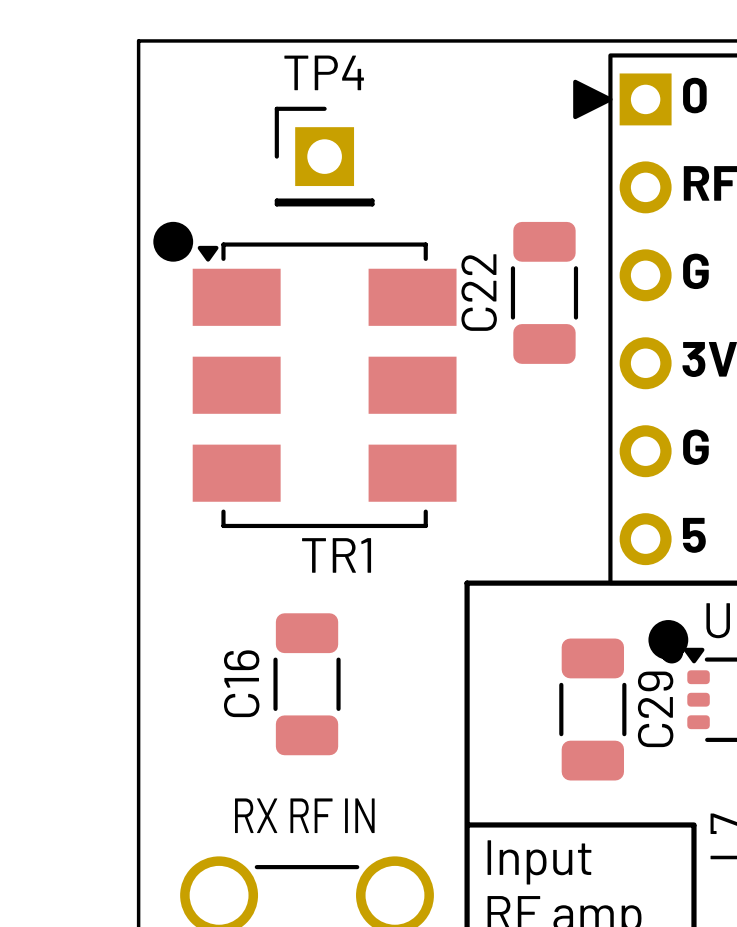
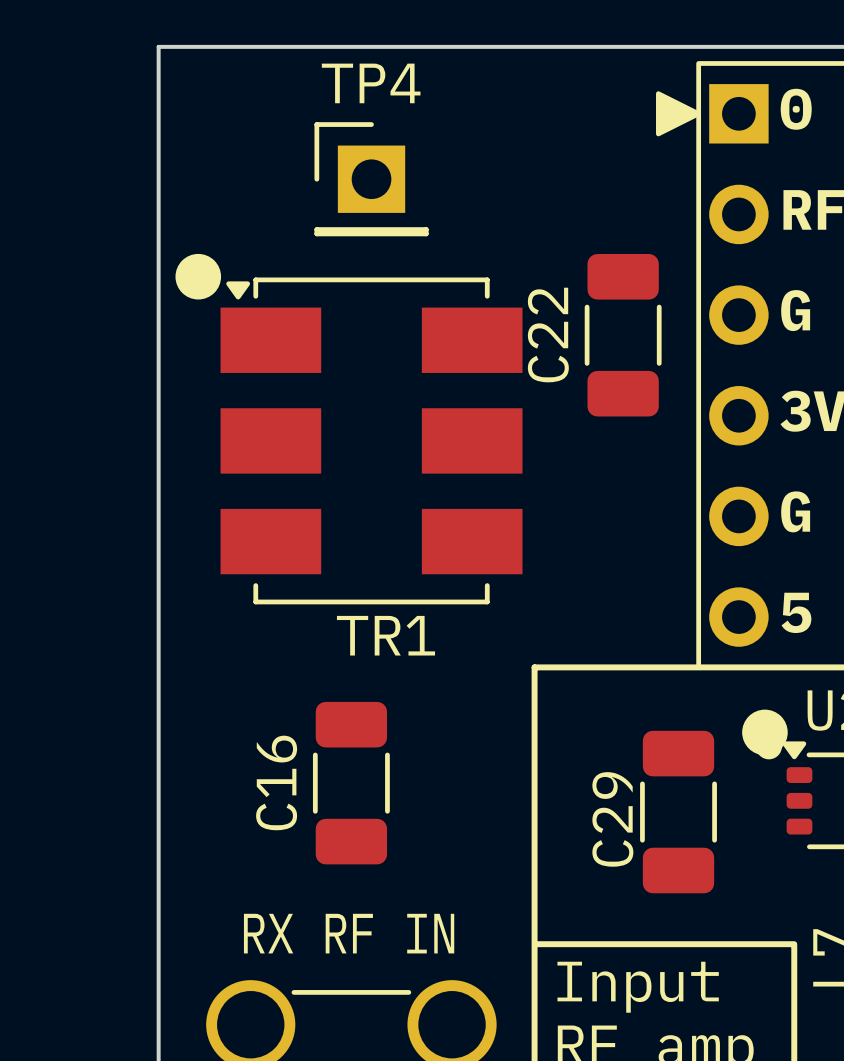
C29 name position: C29 (655, 709) -> C29 (612, 819)

